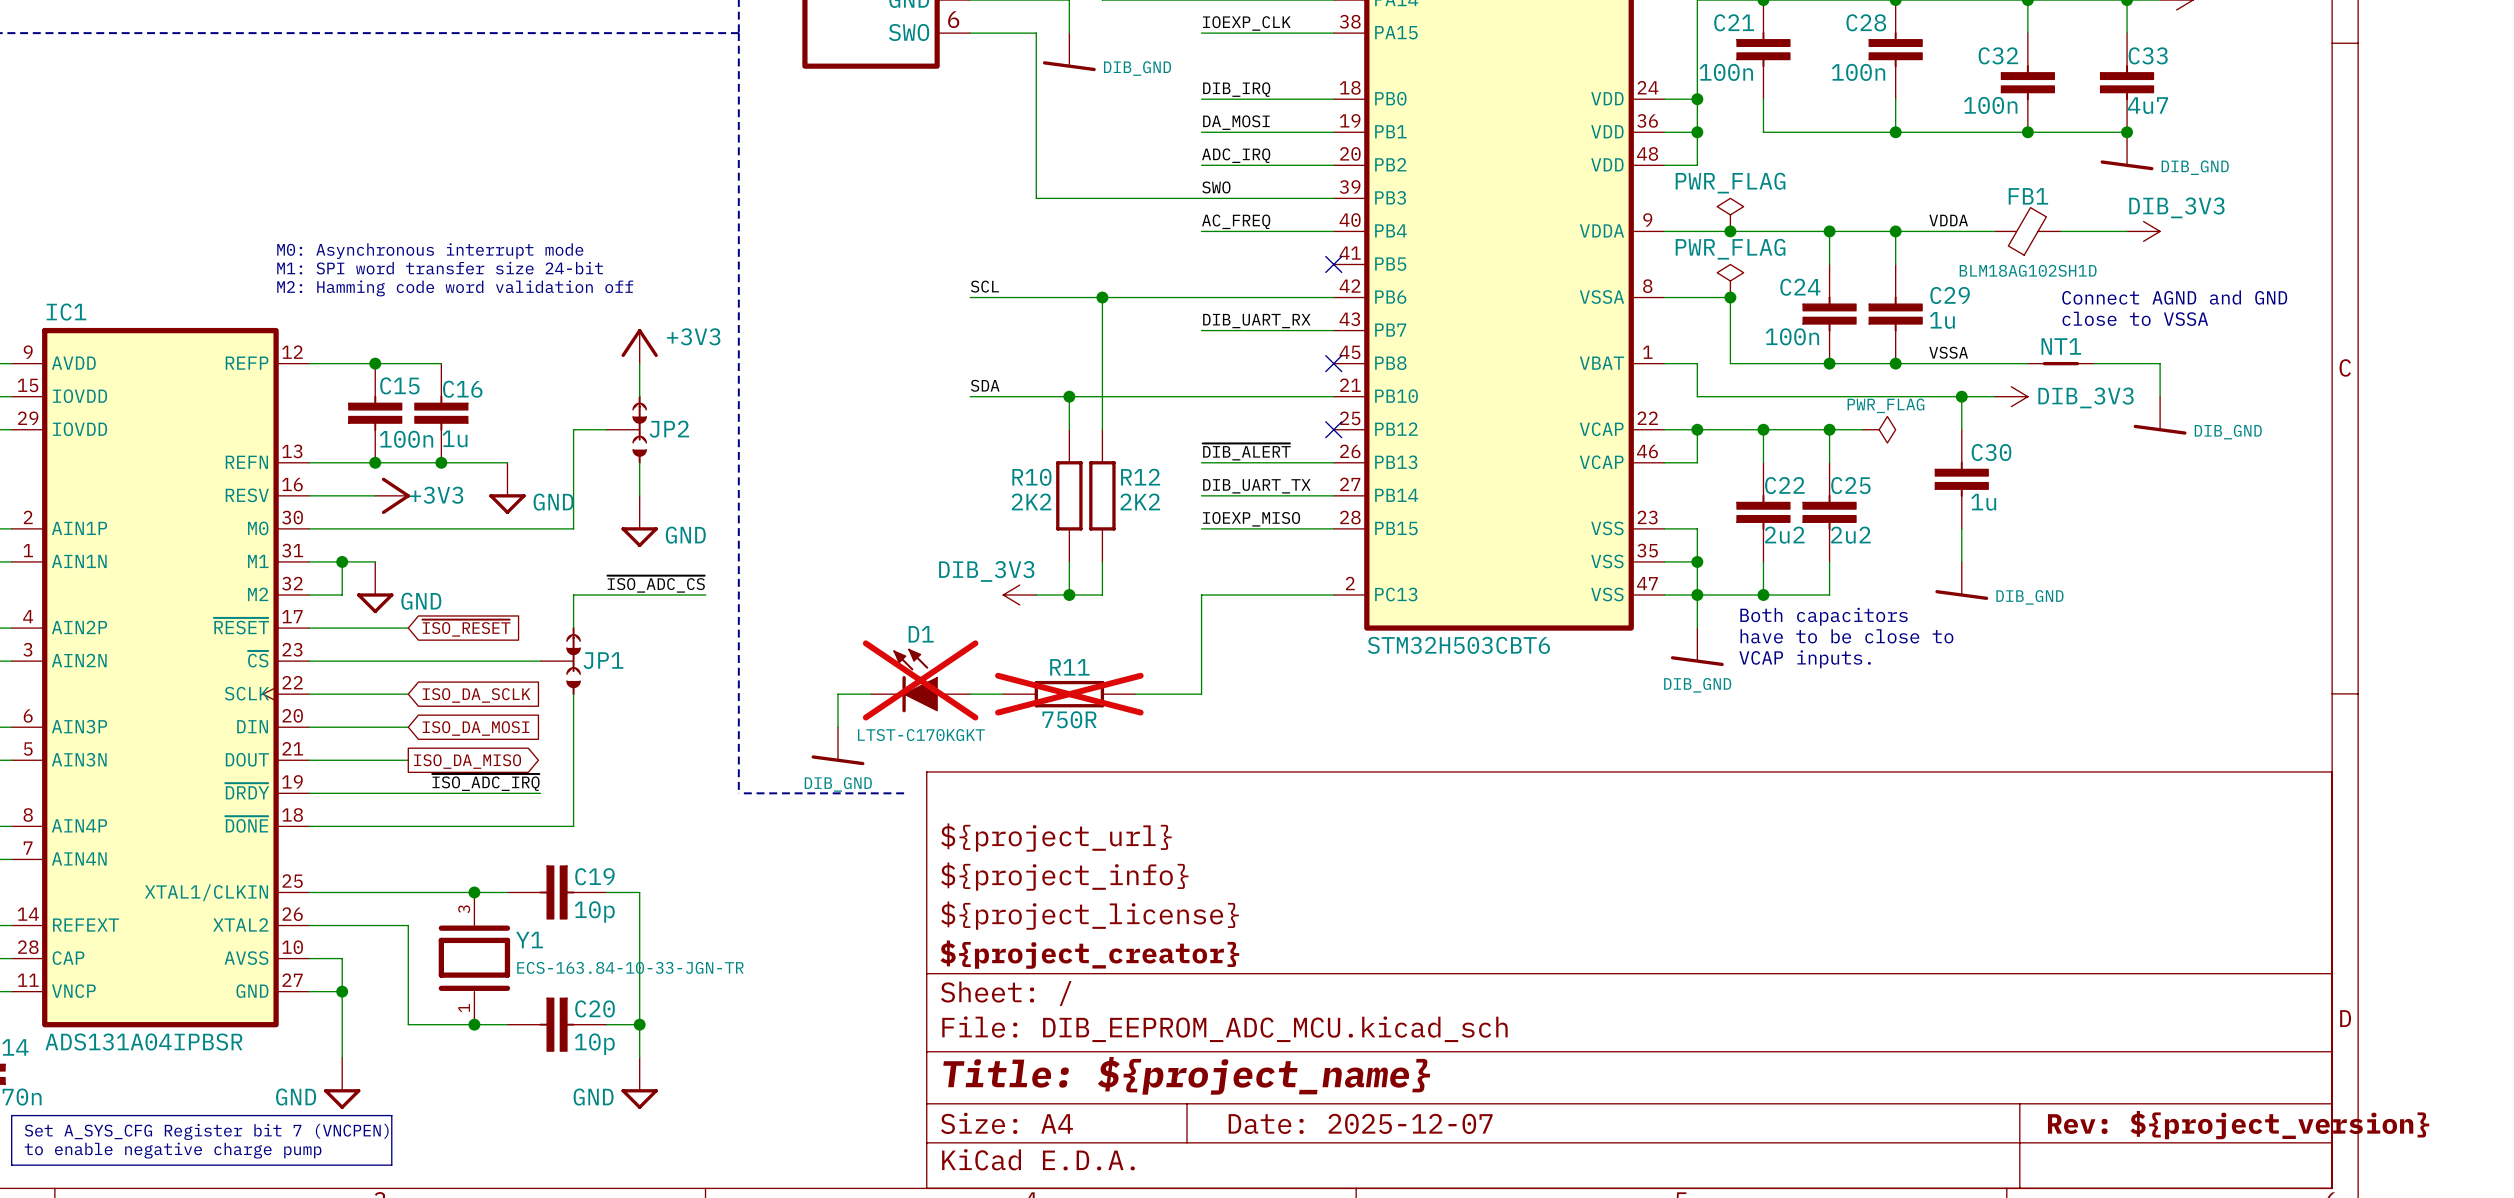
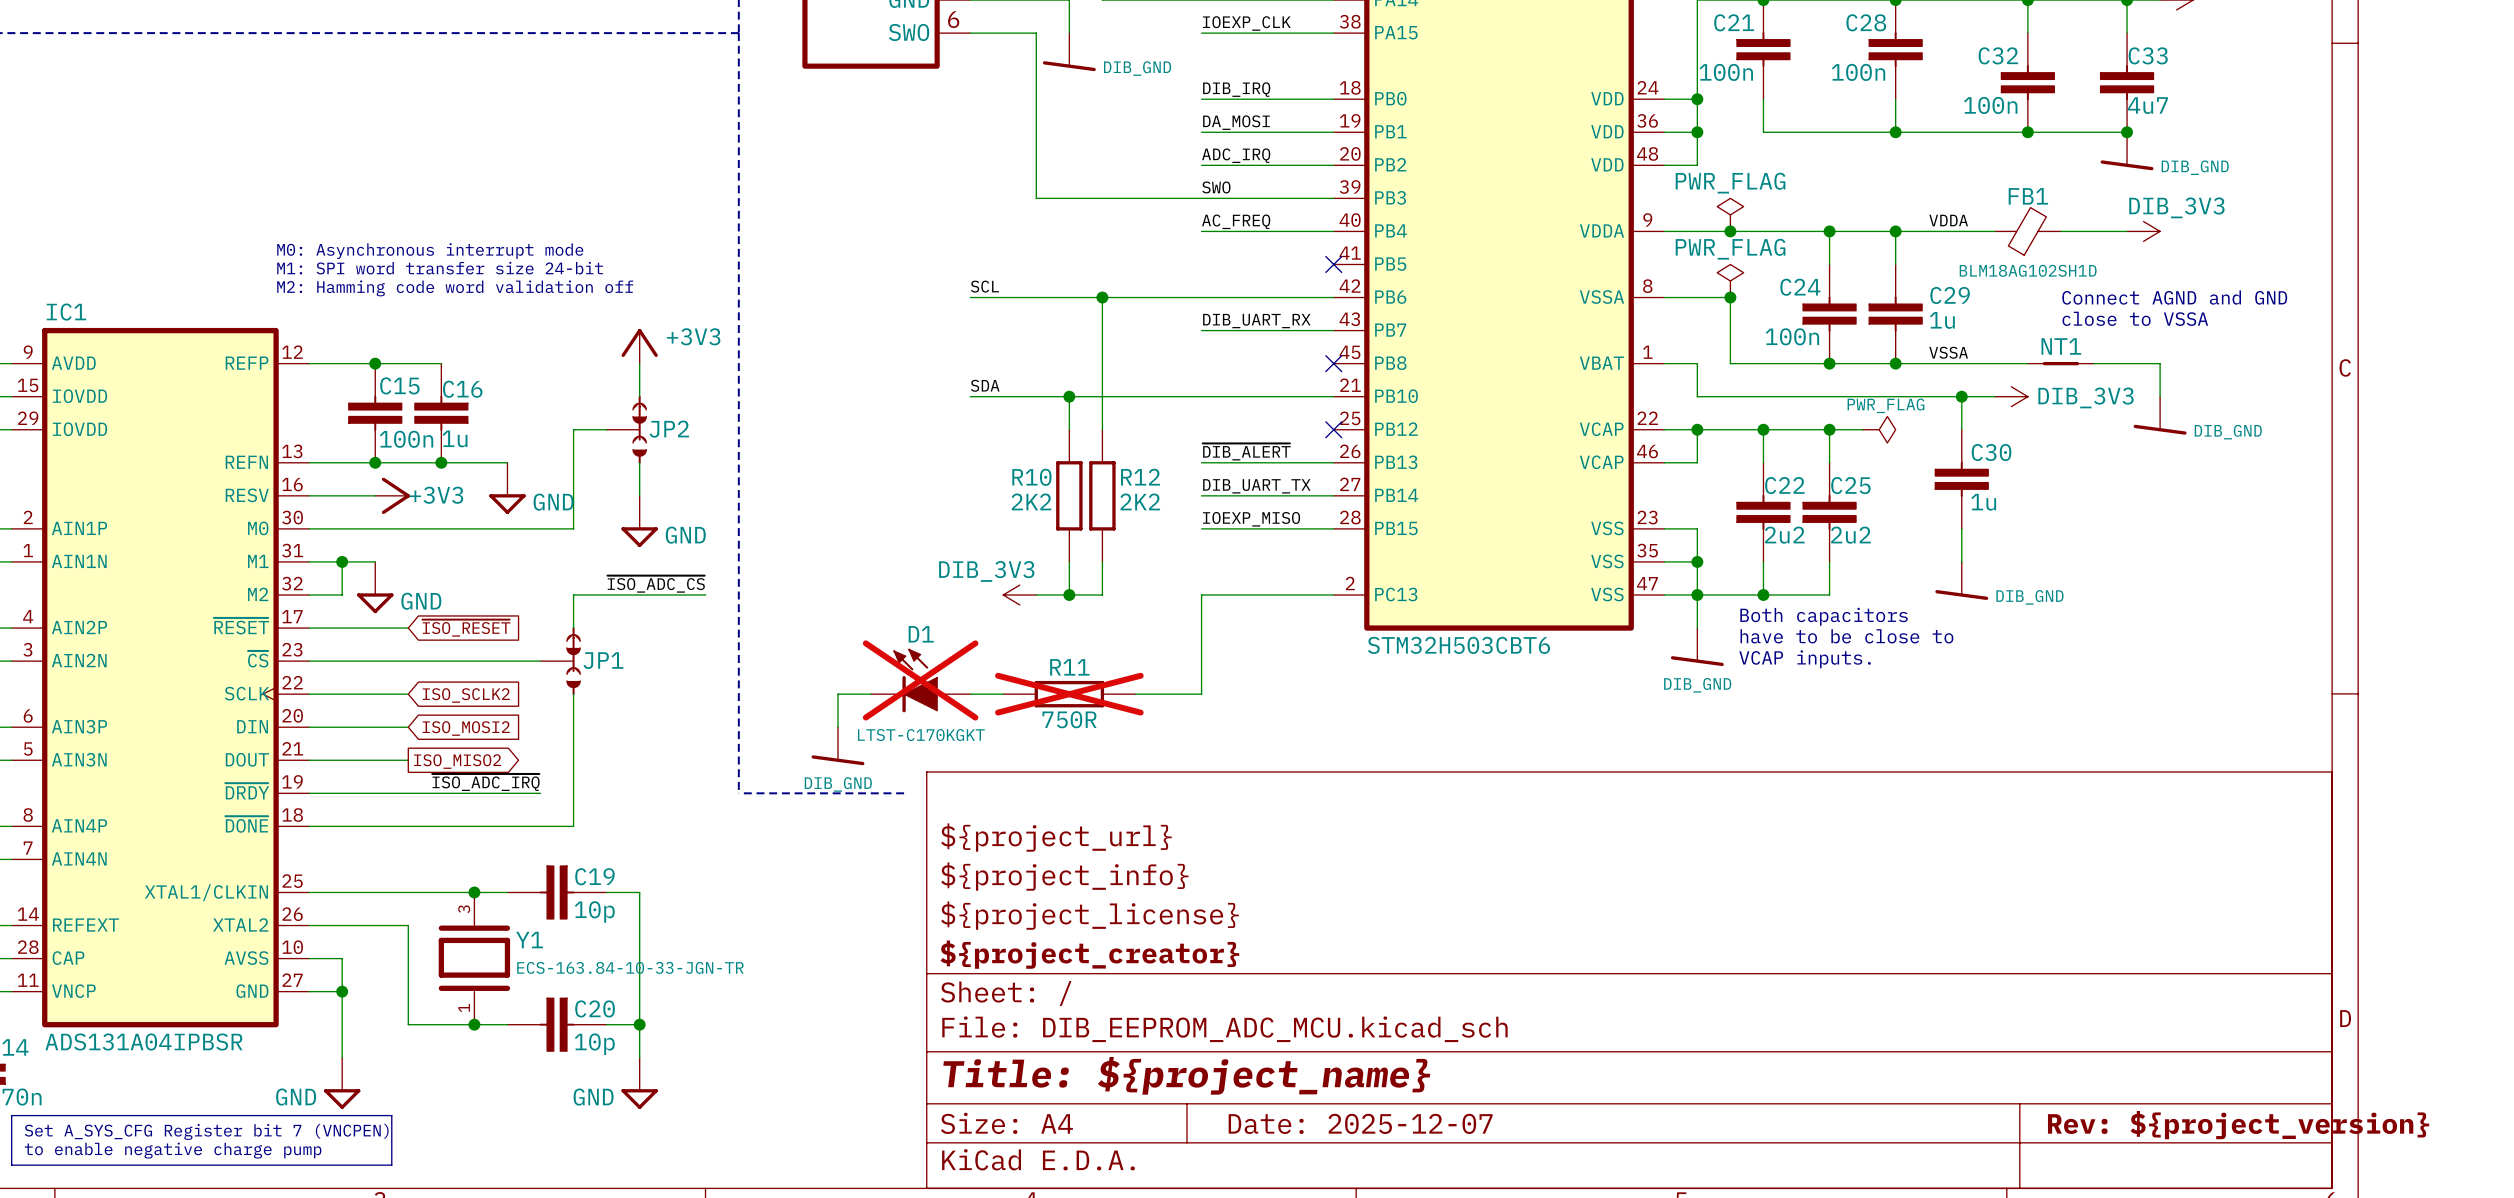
global label: ISO_DA_SCLK (476, 695) -> ISO_SCLK2 (466, 695)
global label: ISO_DA_MOSI (476, 728) -> ISO_MOSI2 (466, 728)
global label: ISO_DA_MISO (467, 761) -> ISO_MISO2 (457, 761)

